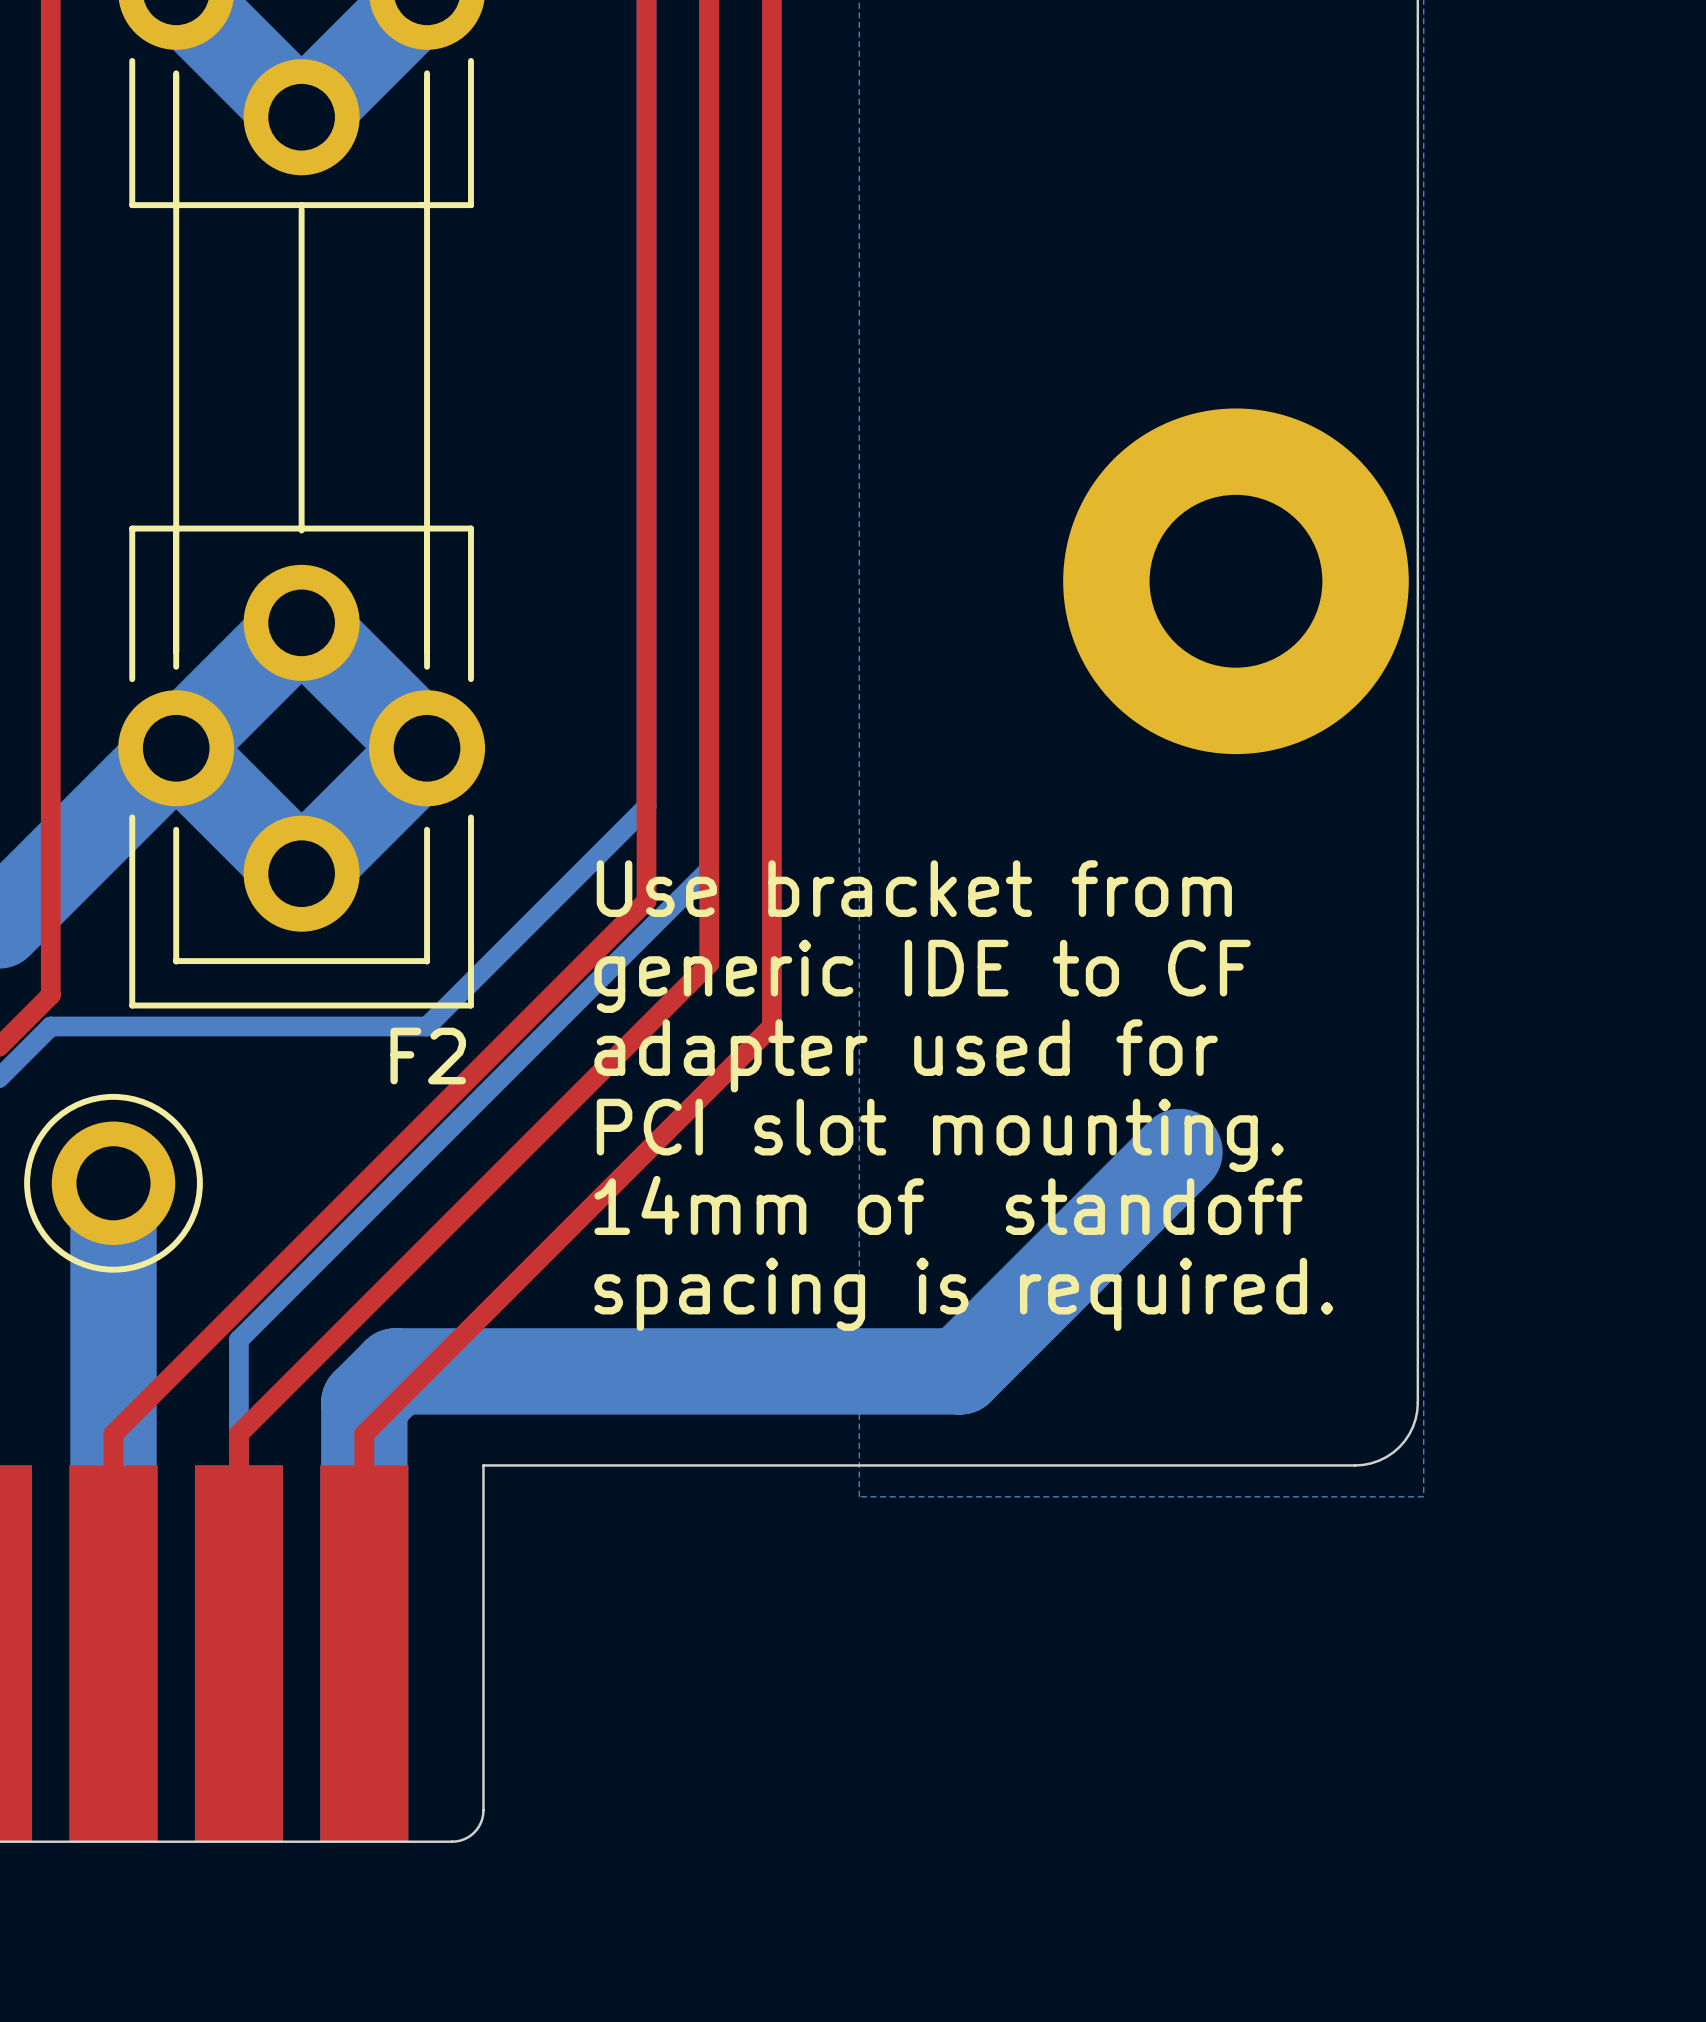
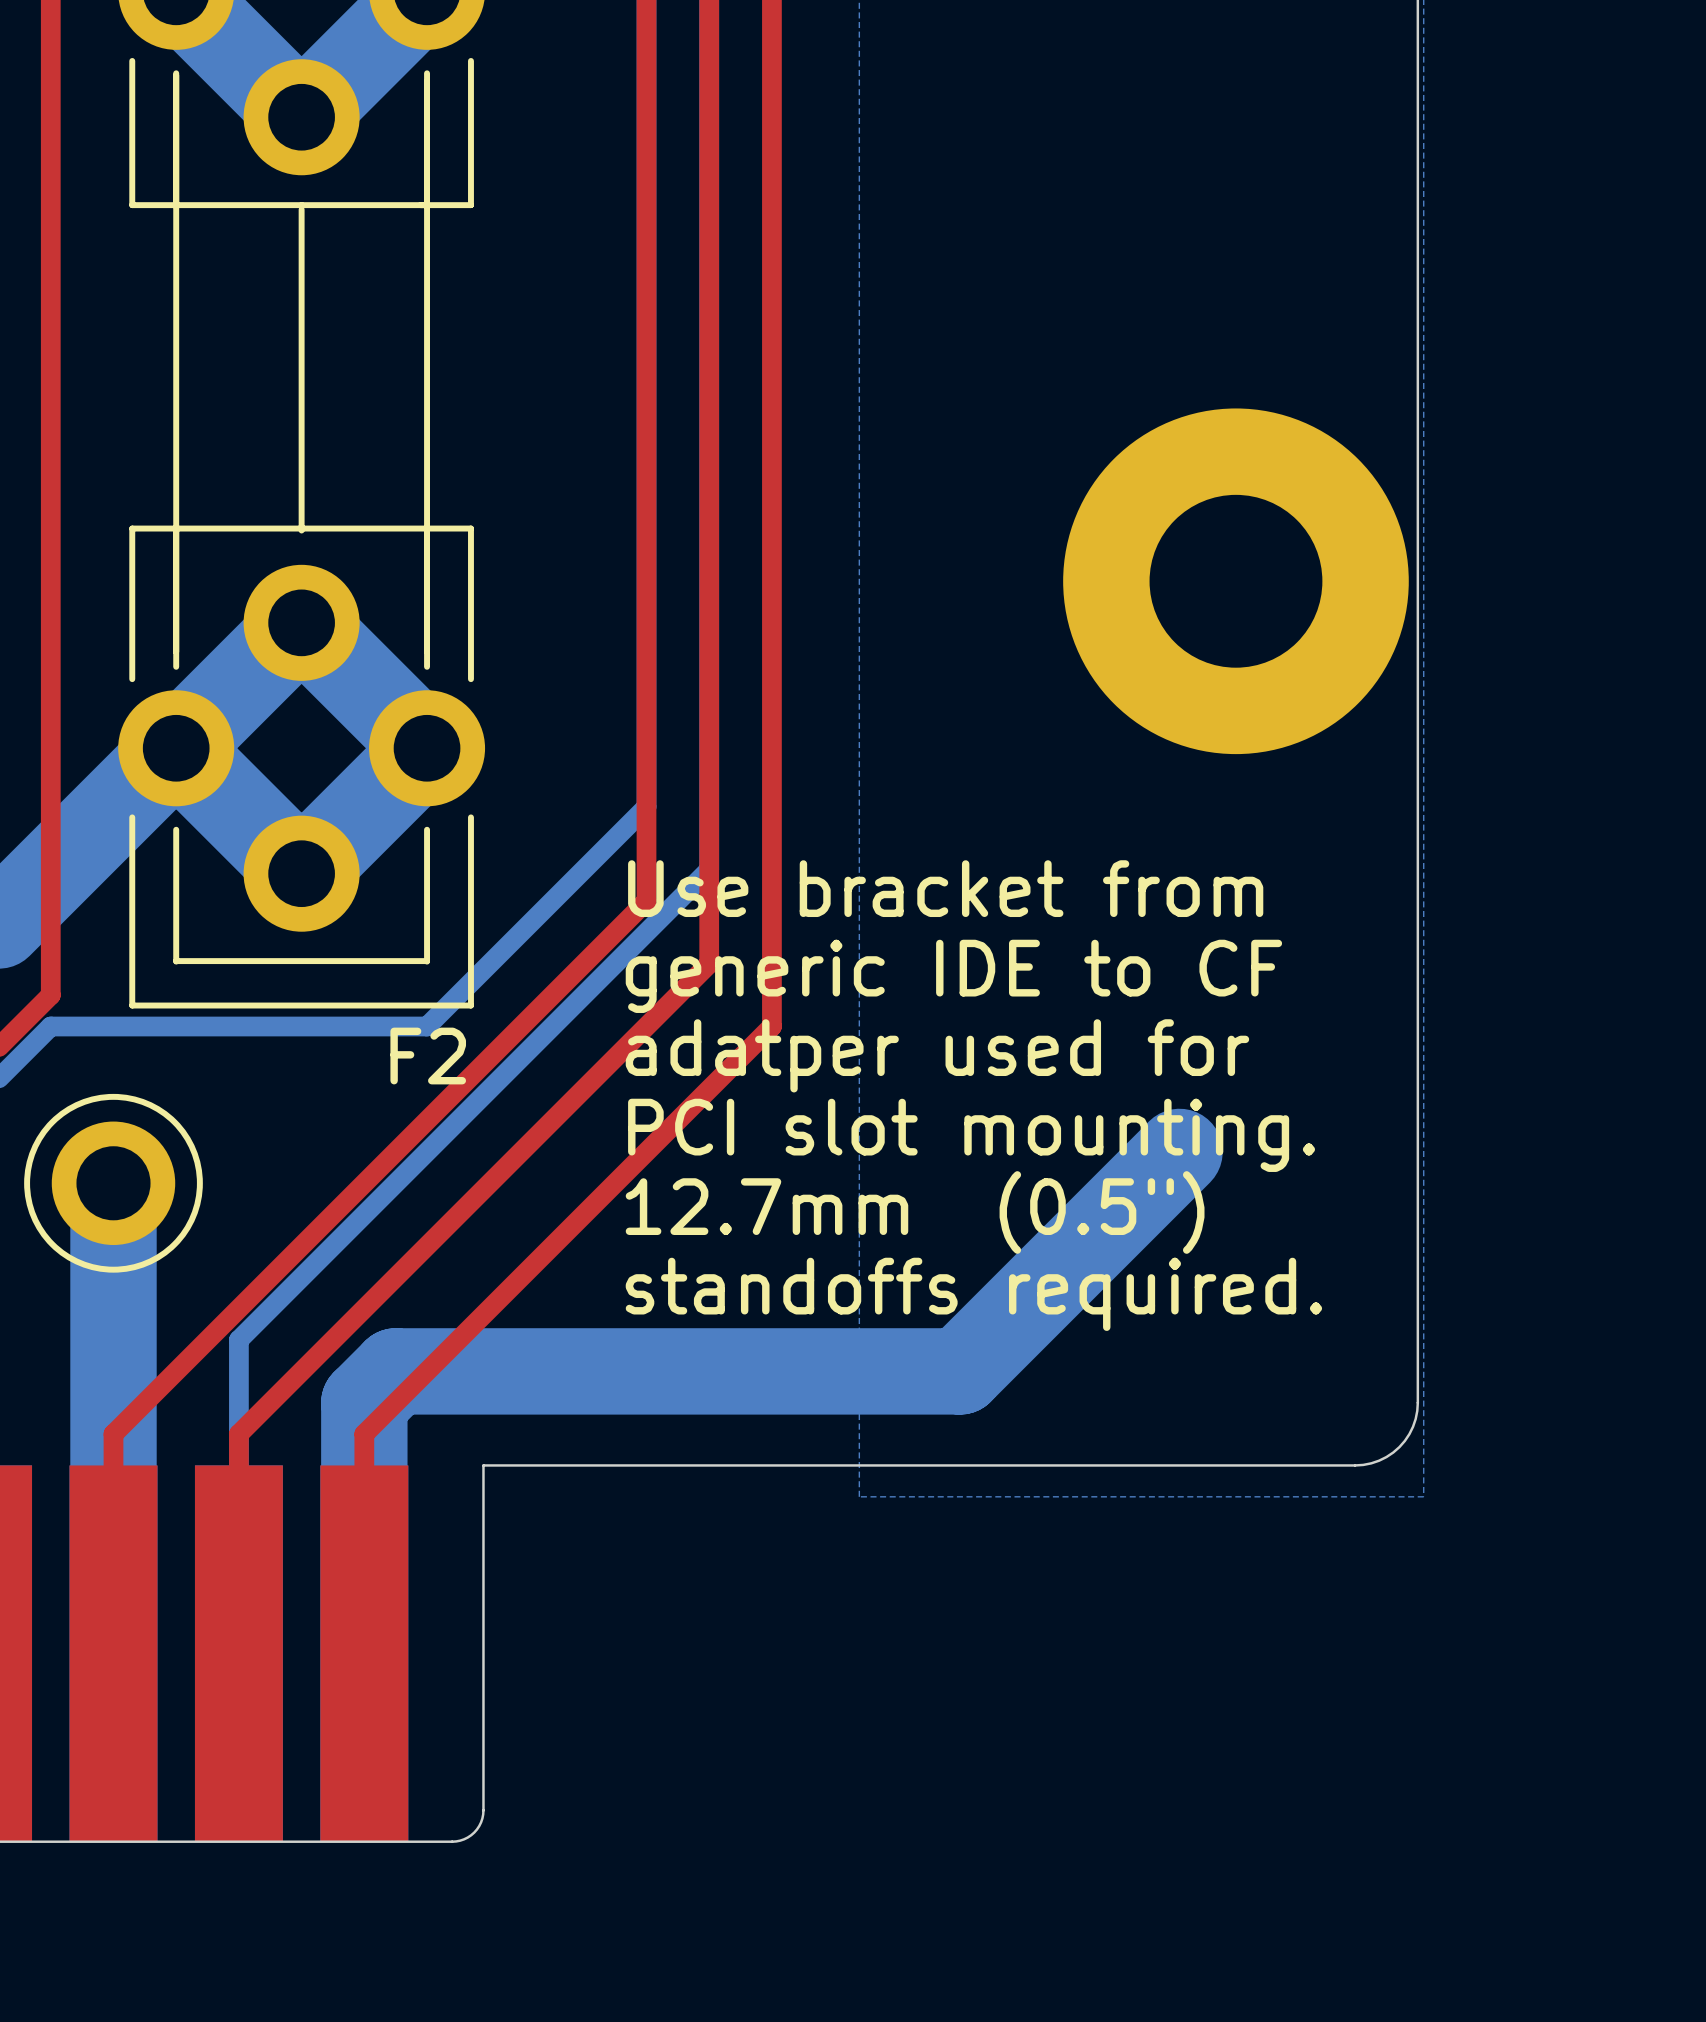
text position: Use bracket from (914, 888) -> Use bracket from (945, 888)
text position: generic IDE to CF (922, 976) -> generic IDE to CF (953, 976)
text: adapter used for (906, 1055) -> adatper used for (937, 1055)
text position: PCI slot mounting. (940, 1135) -> PCI slot mounting. (971, 1135)
text: 14mm of standoff (948, 1205) -> 12.7mm (0.5") (915, 1212)
text: spacing is required. (963, 1294) -> standoffs required. (973, 1294)

